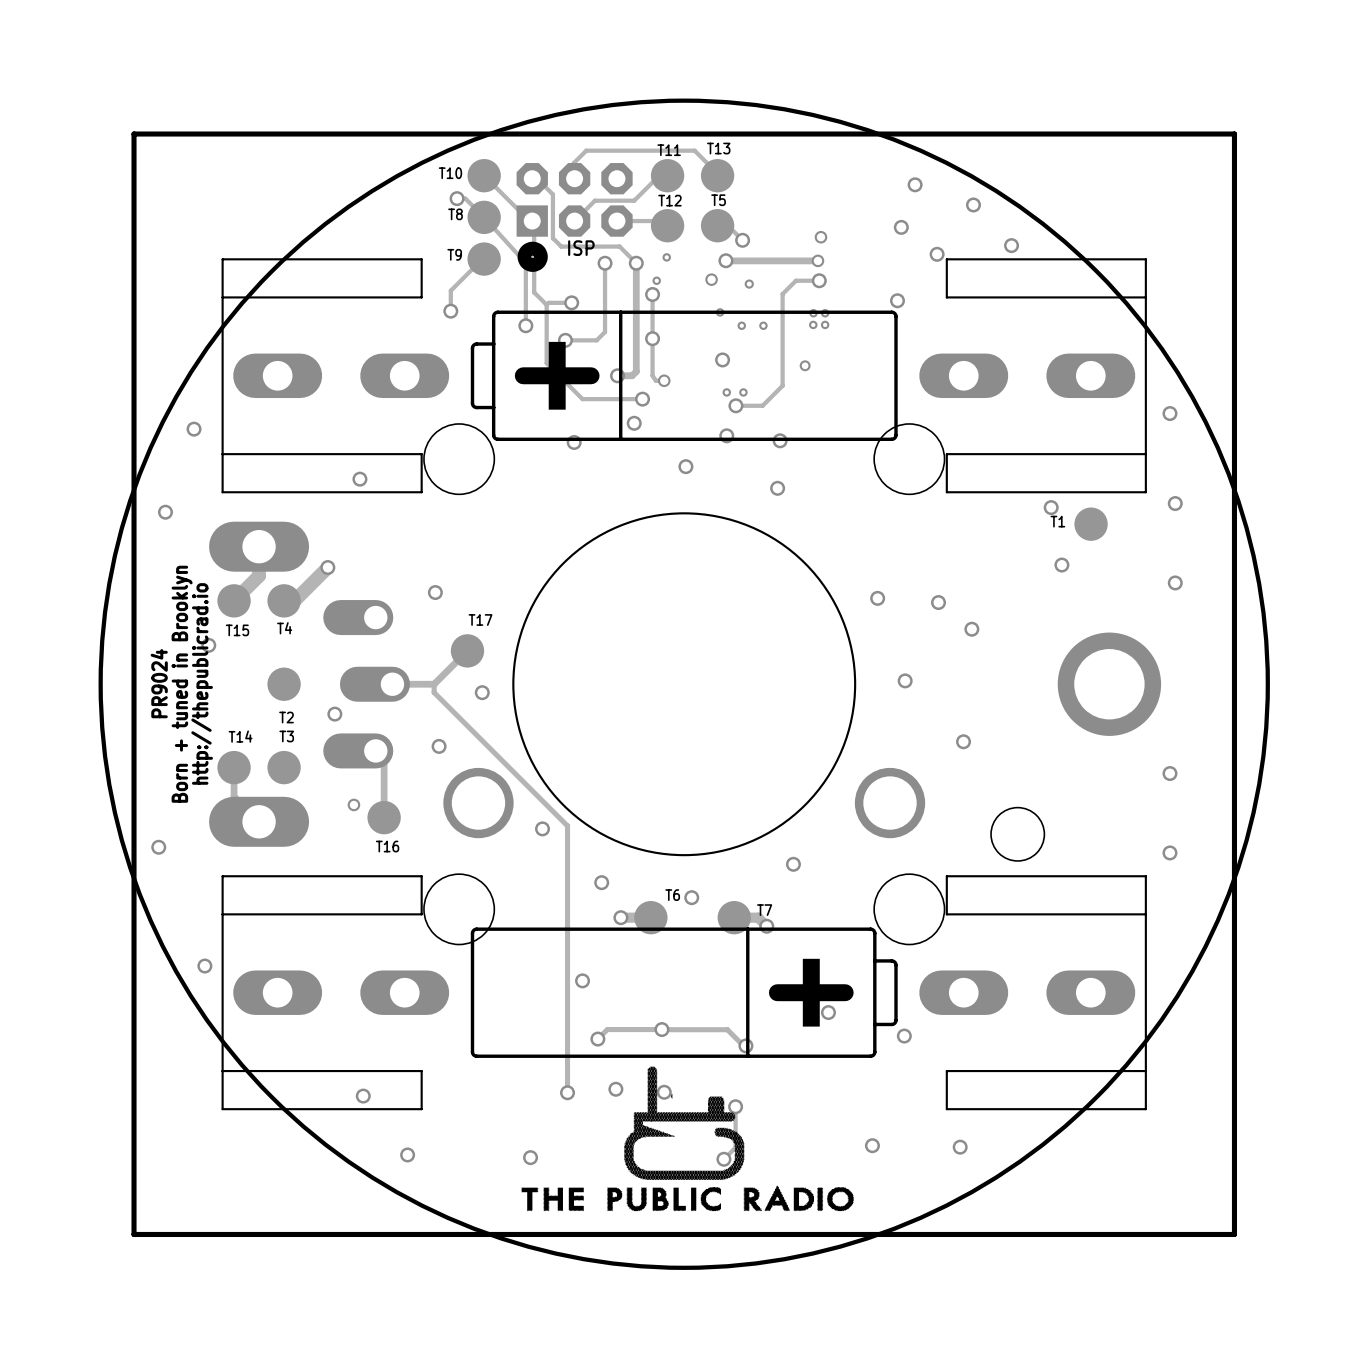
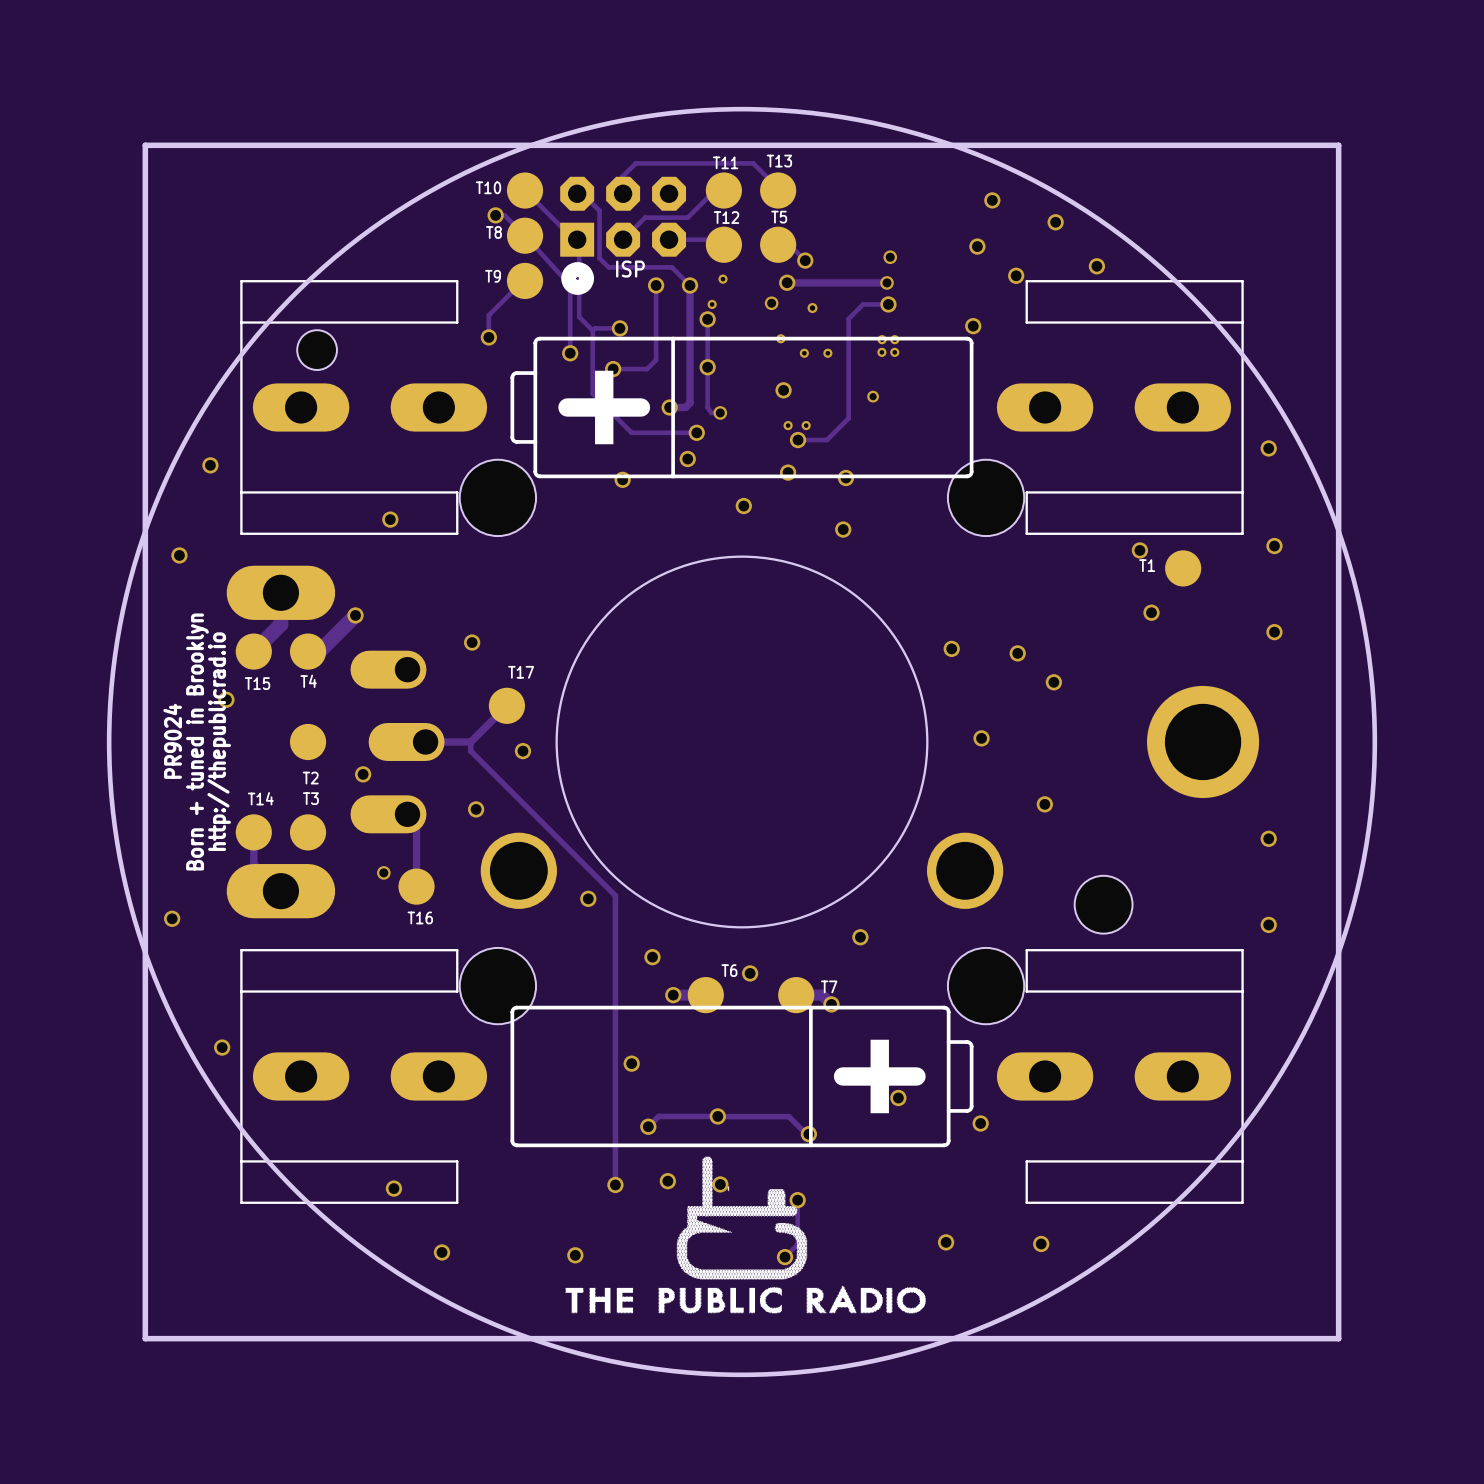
part: none -> (317, 350)

